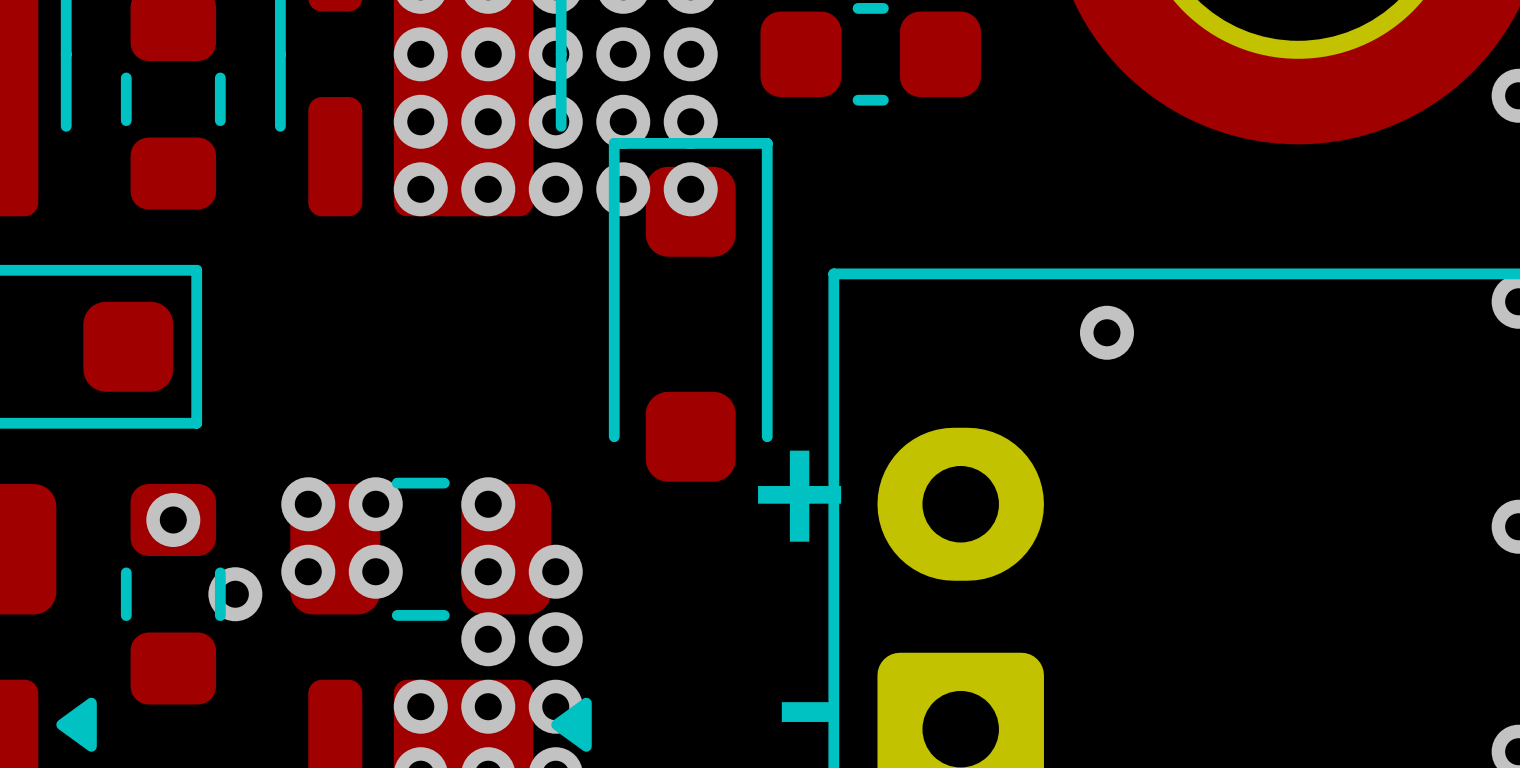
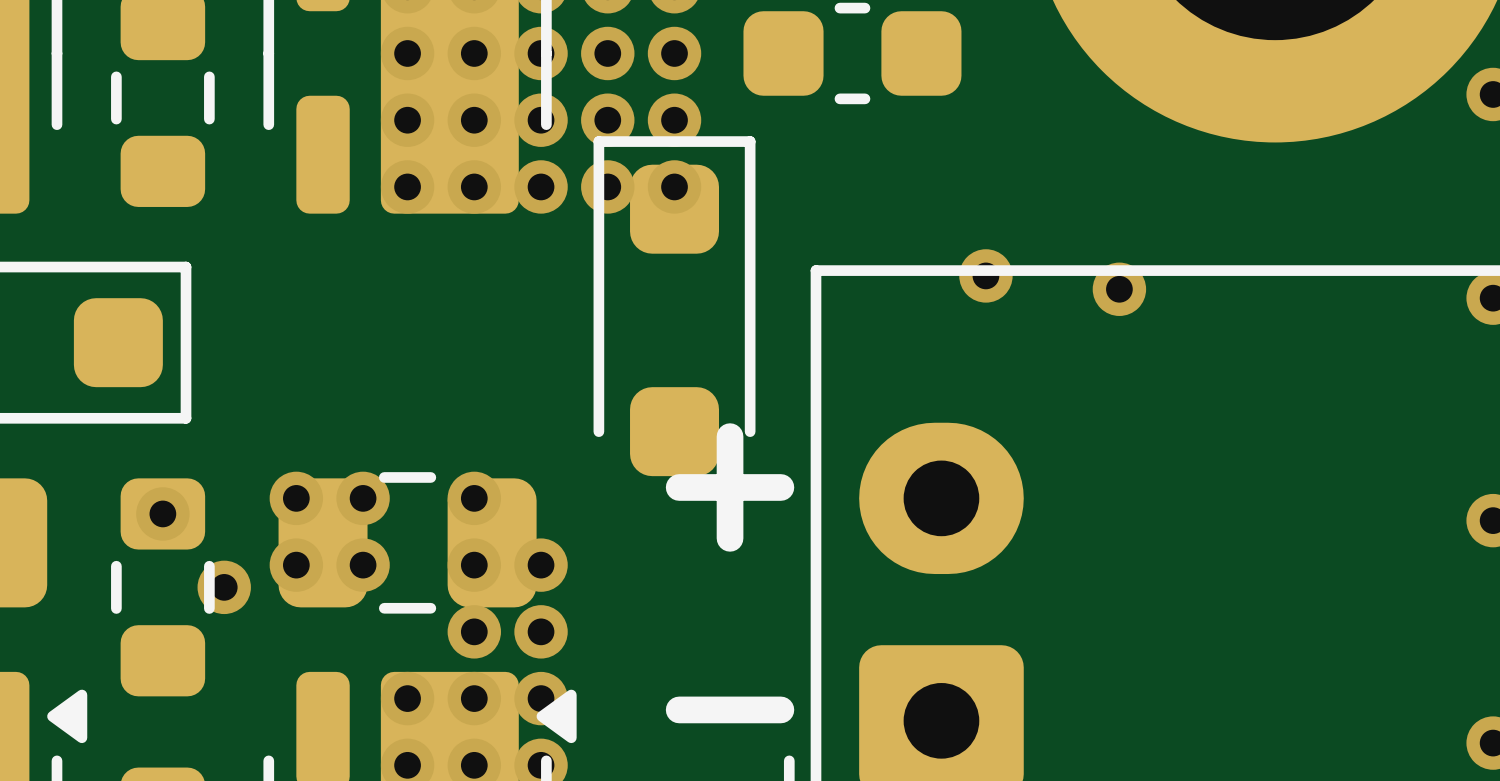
via: none -> (985, 275)
via position: (1106, 332) -> (1119, 289)

